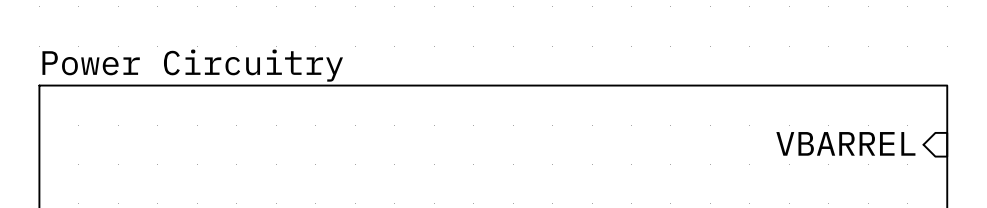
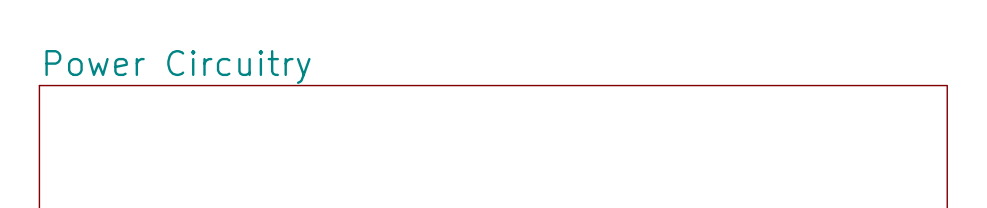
sheet pin: VBARREL (845, 143) -> none

